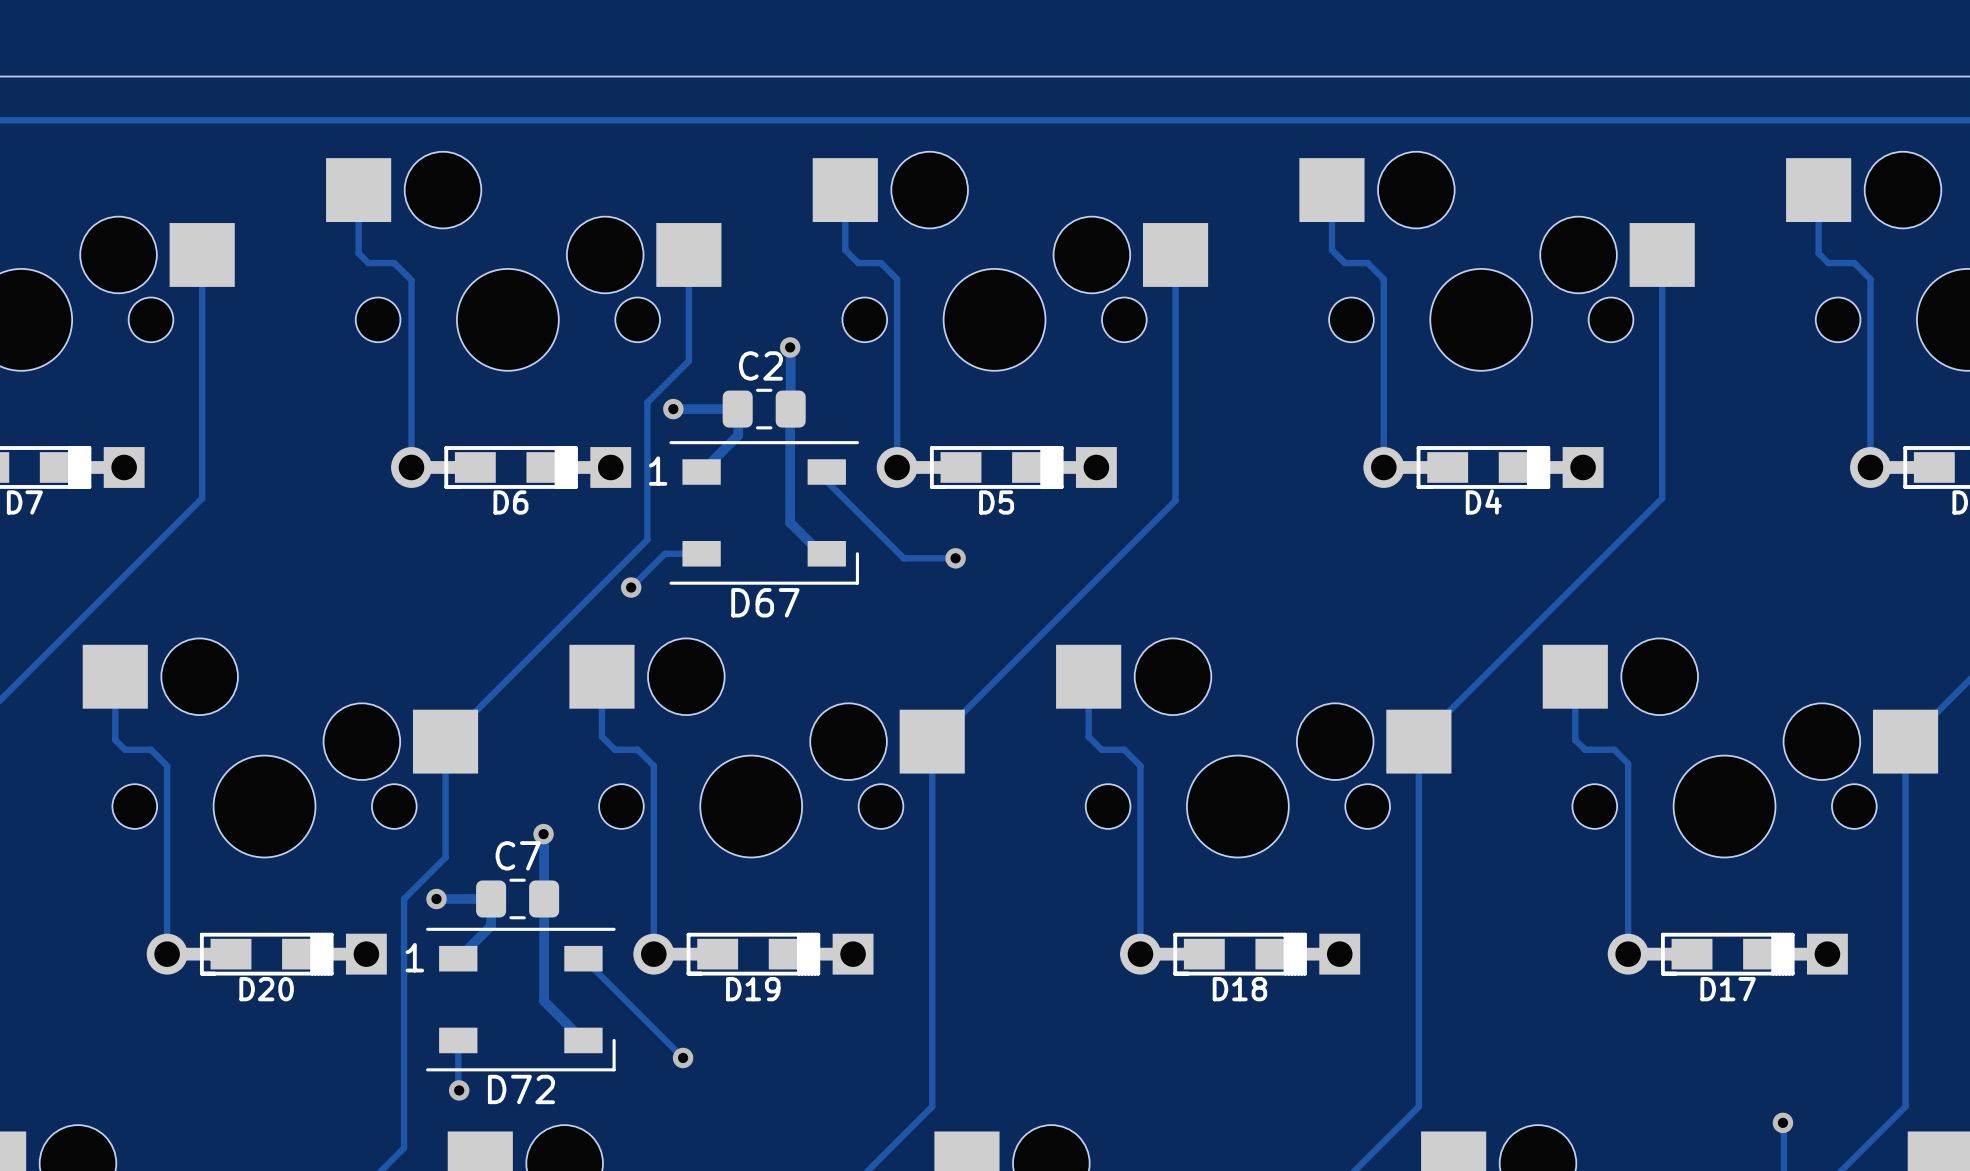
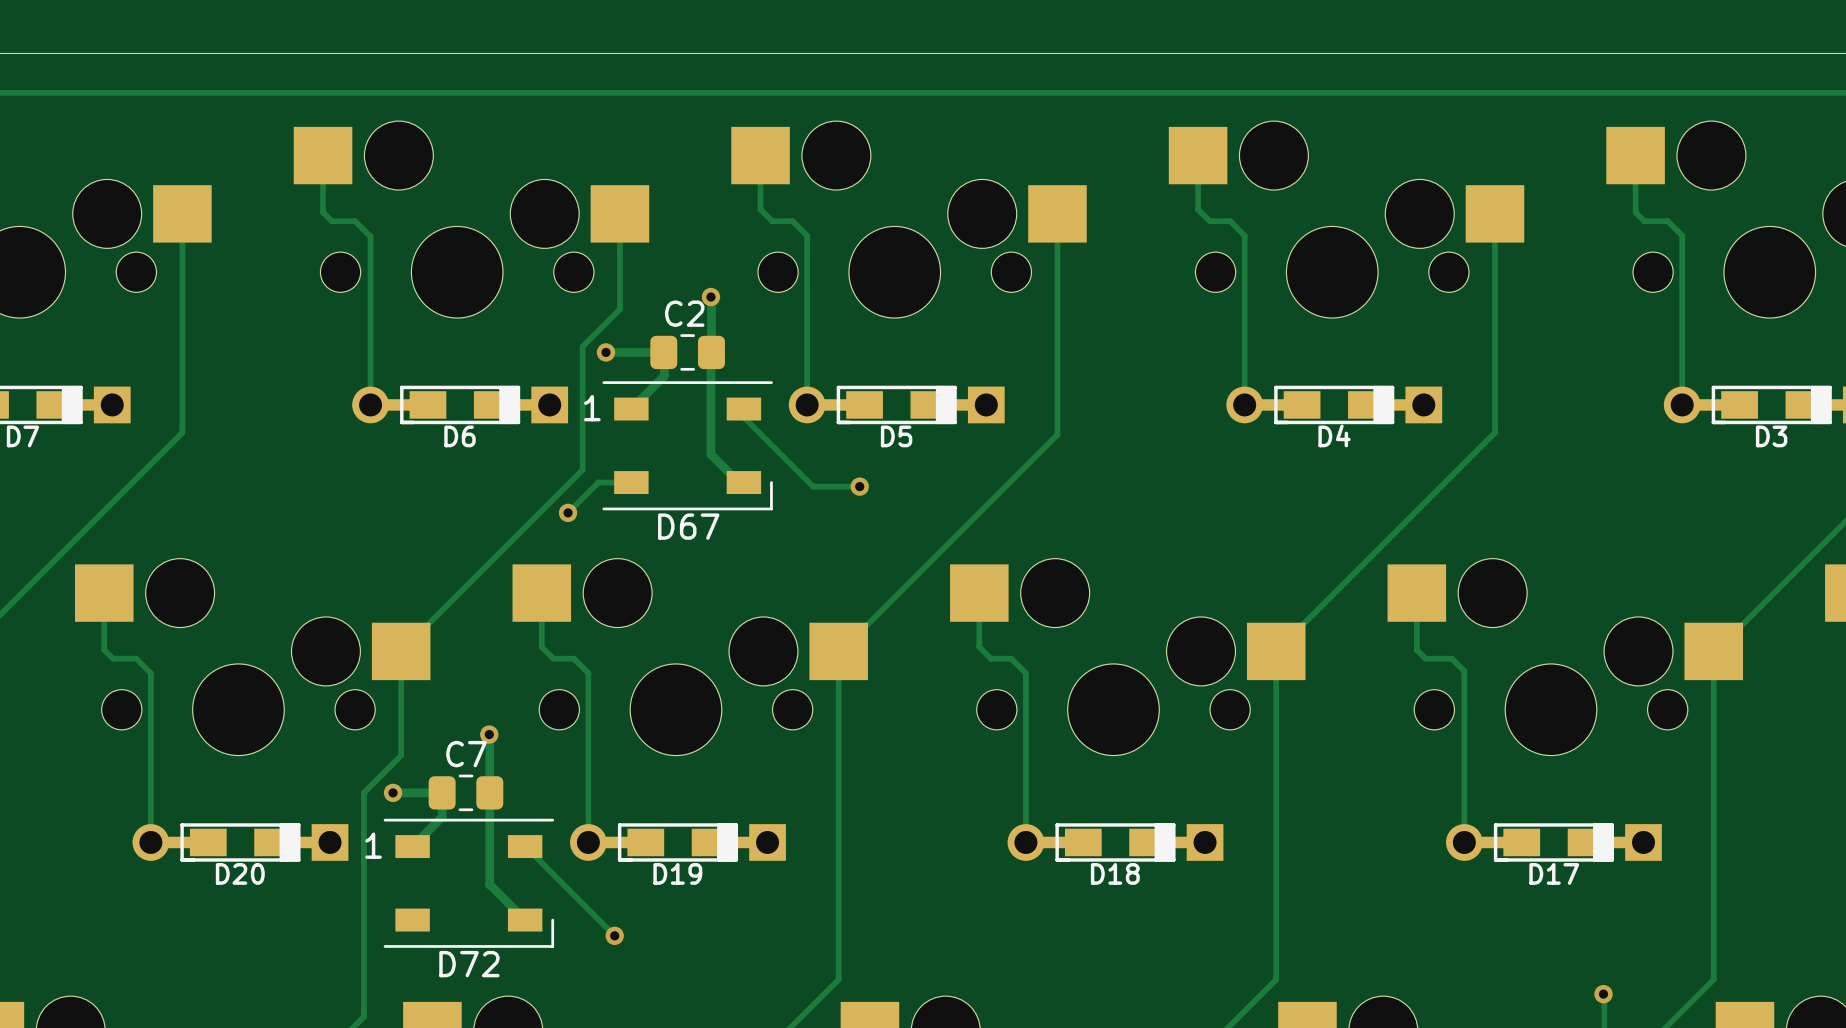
track: (458, 1040) (459, 1090) -> none
via: (459, 1090) -> none

